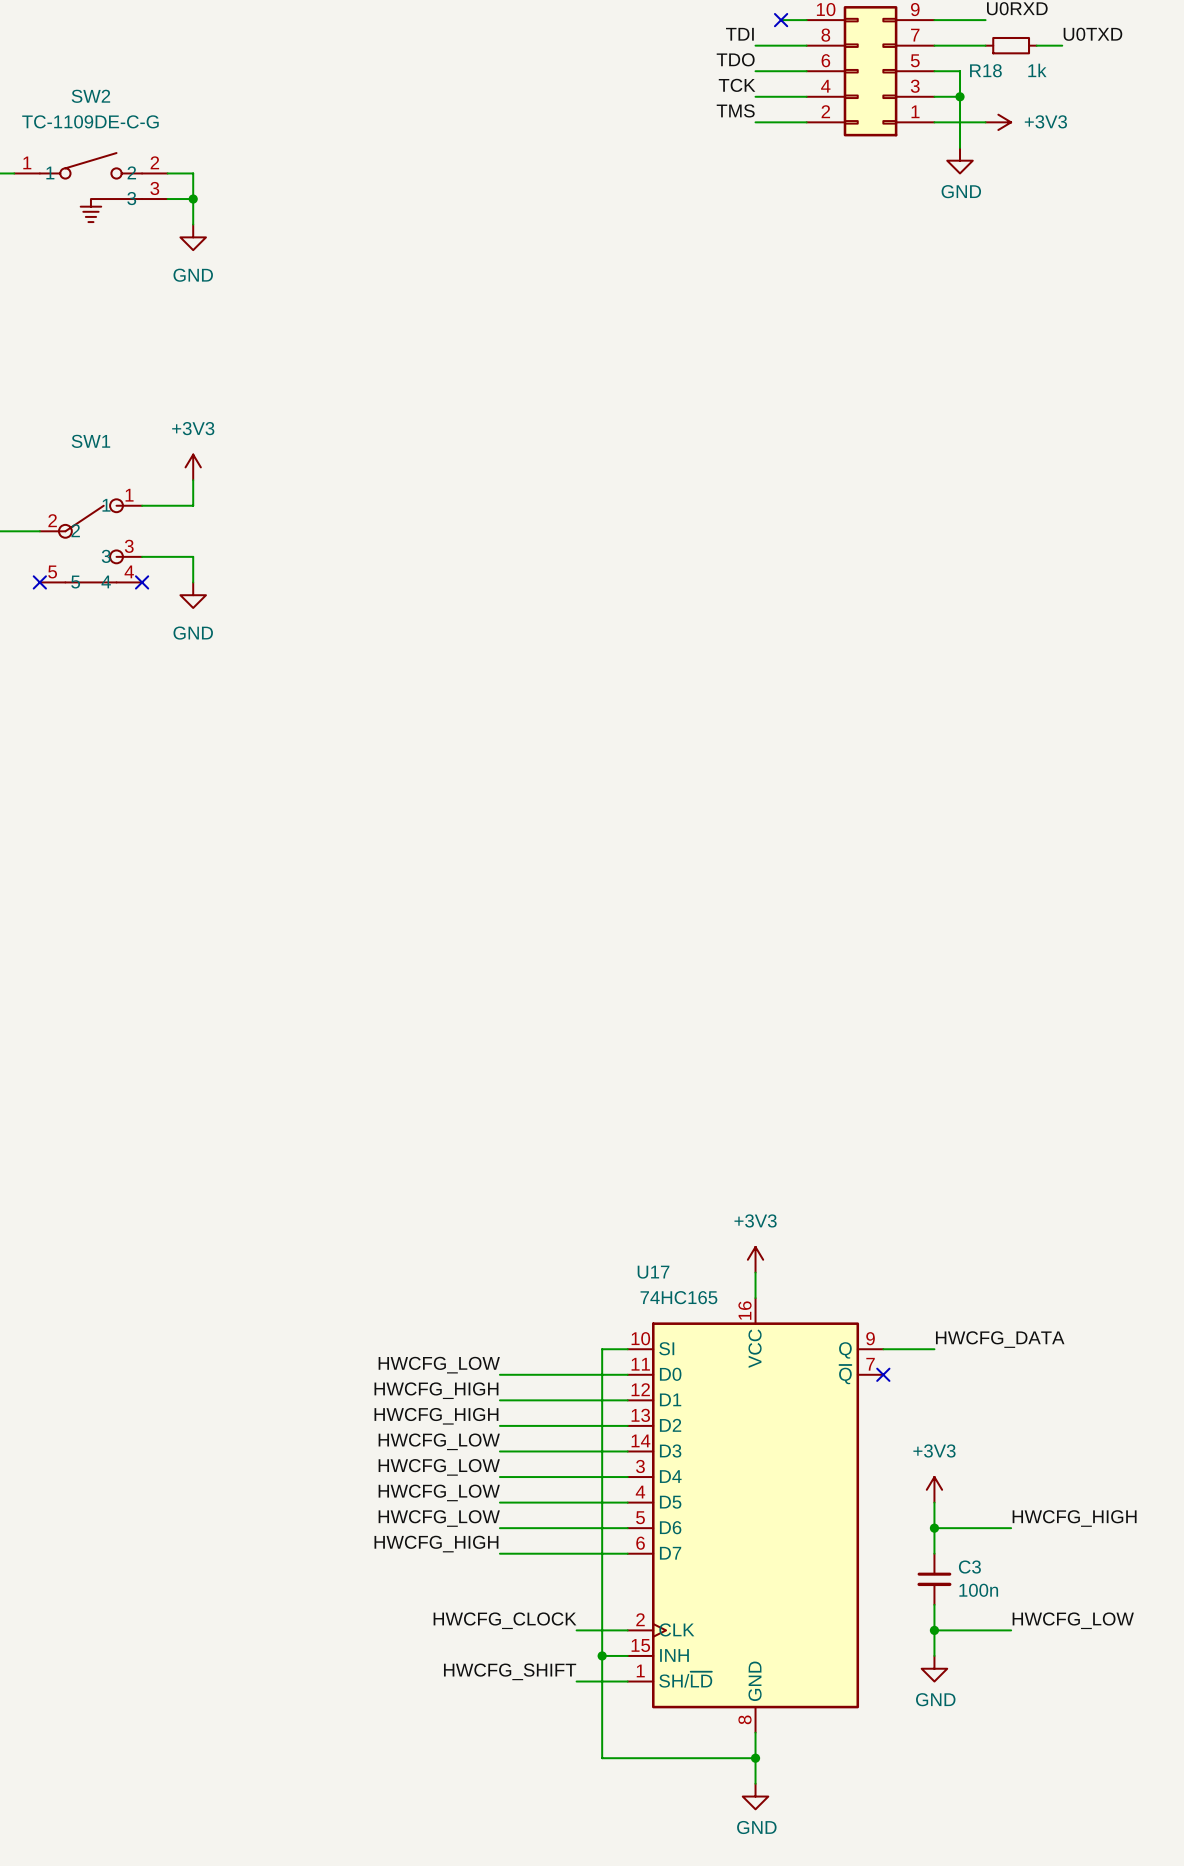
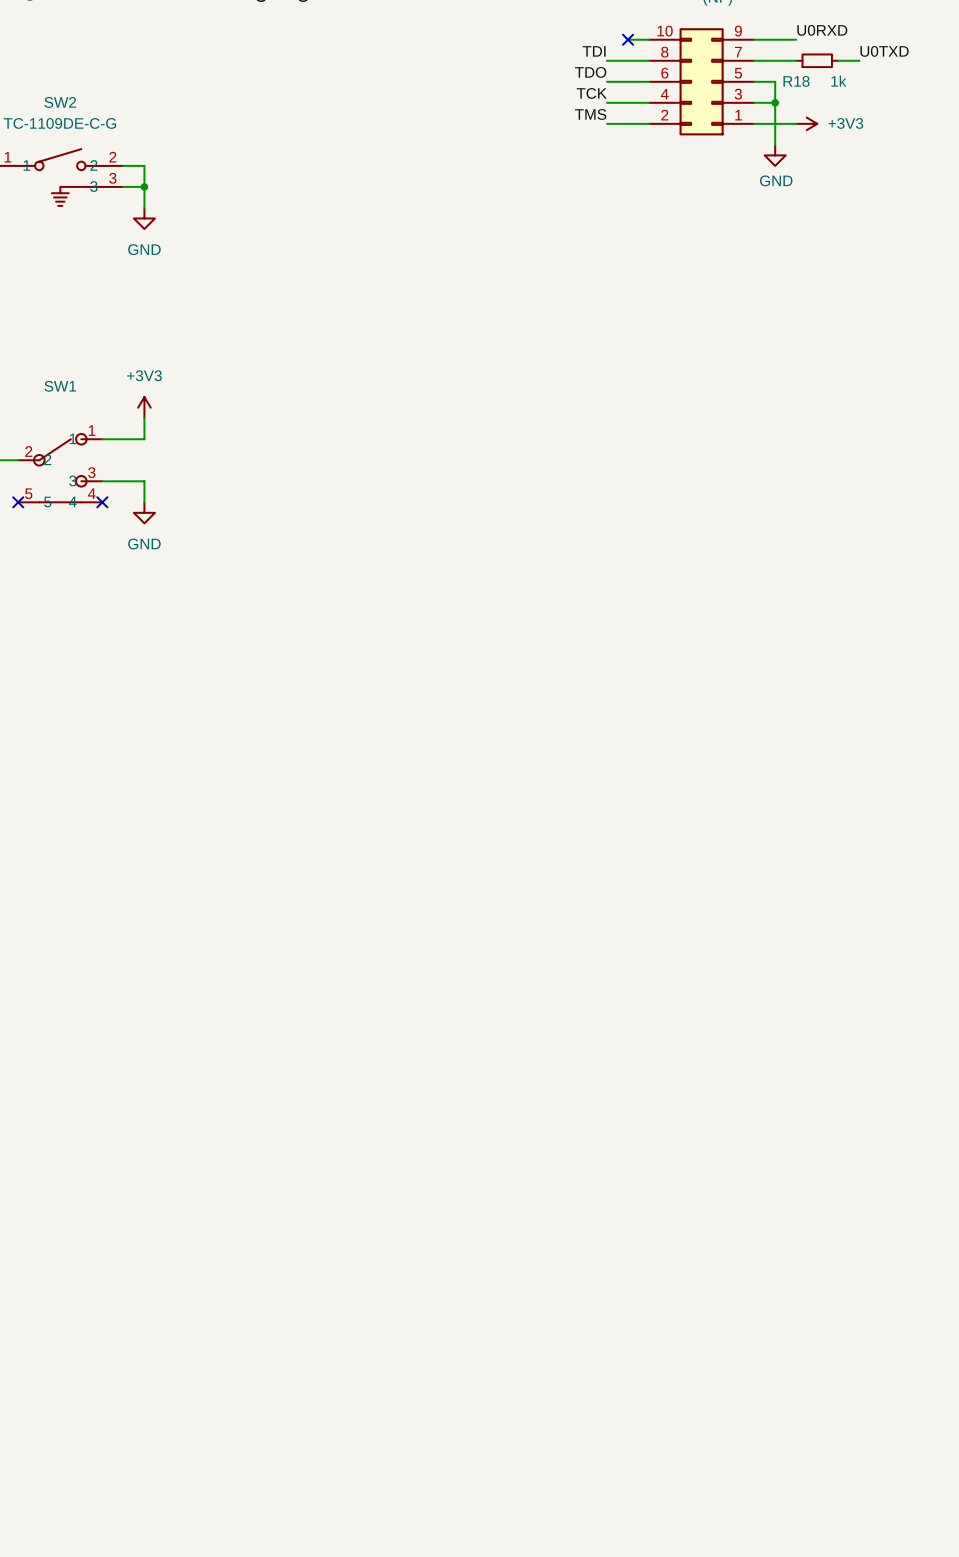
power symbol: +3V3 (755, 1259) -> none
wire: (755, 1272) (755, 1298) -> none
label: HWCFG_DATA (1000, 1339) -> none
wire: (627, 1349) (602, 1349) (602, 1758) (755, 1758) -> none
wire: (883, 1349) (934, 1349) -> none
label: HWCFG_LOW (439, 1365) -> none
wire: (499, 1374) (627, 1374) -> none
no-connect mark: (883, 1374) -> none
label: HWCFG_HIGH (436, 1390) -> none
wire: (499, 1400) (627, 1400) -> none
label: HWCFG_HIGH (436, 1416) -> none
wire: (499, 1425) (627, 1425) -> none
label: HWCFG_LOW (439, 1441) -> none
wire: (499, 1451) (627, 1451) -> none
label: HWCFG_LOW (439, 1467) -> none
wire: (499, 1477) (627, 1477) -> none
power symbol: +3V3 (934, 1489) -> none
label: HWCFG_LOW (439, 1492) -> none
wire: (499, 1502) (627, 1502) -> none
wire: (934, 1502) (934, 1553) -> none
U17: 74HC165 (755, 1515) -> none
label: HWCFG_LOW (439, 1518) -> none
label: HWCFG_HIGH (1074, 1518) -> none
wire: (499, 1528) (627, 1528) -> none
wire: (934, 1528) (1011, 1528) -> none
junction: (934, 1528) -> none
label: HWCFG_HIGH (436, 1544) -> none
wire: (499, 1553) (627, 1553) -> none
C3: 100n (934, 1579) -> none
wire: (934, 1604) (934, 1655) -> none
label: HWCFG_CLOCK (505, 1620) -> none
label: HWCFG_LOW (1073, 1620) -> none
wire: (576, 1630) (627, 1630) -> none
wire: (934, 1630) (1011, 1630) -> none
junction: (934, 1630) -> none
wire: (602, 1655) (627, 1655) -> none
junction: (602, 1655) -> none
power symbol: GND (934, 1668) -> none
label: HWCFG_SHIFT (510, 1671) -> none
wire: (576, 1681) (627, 1681) -> none
wire: (755, 1732) (755, 1783) -> none
junction: (755, 1758) -> none
power symbol: GND (755, 1796) -> none

